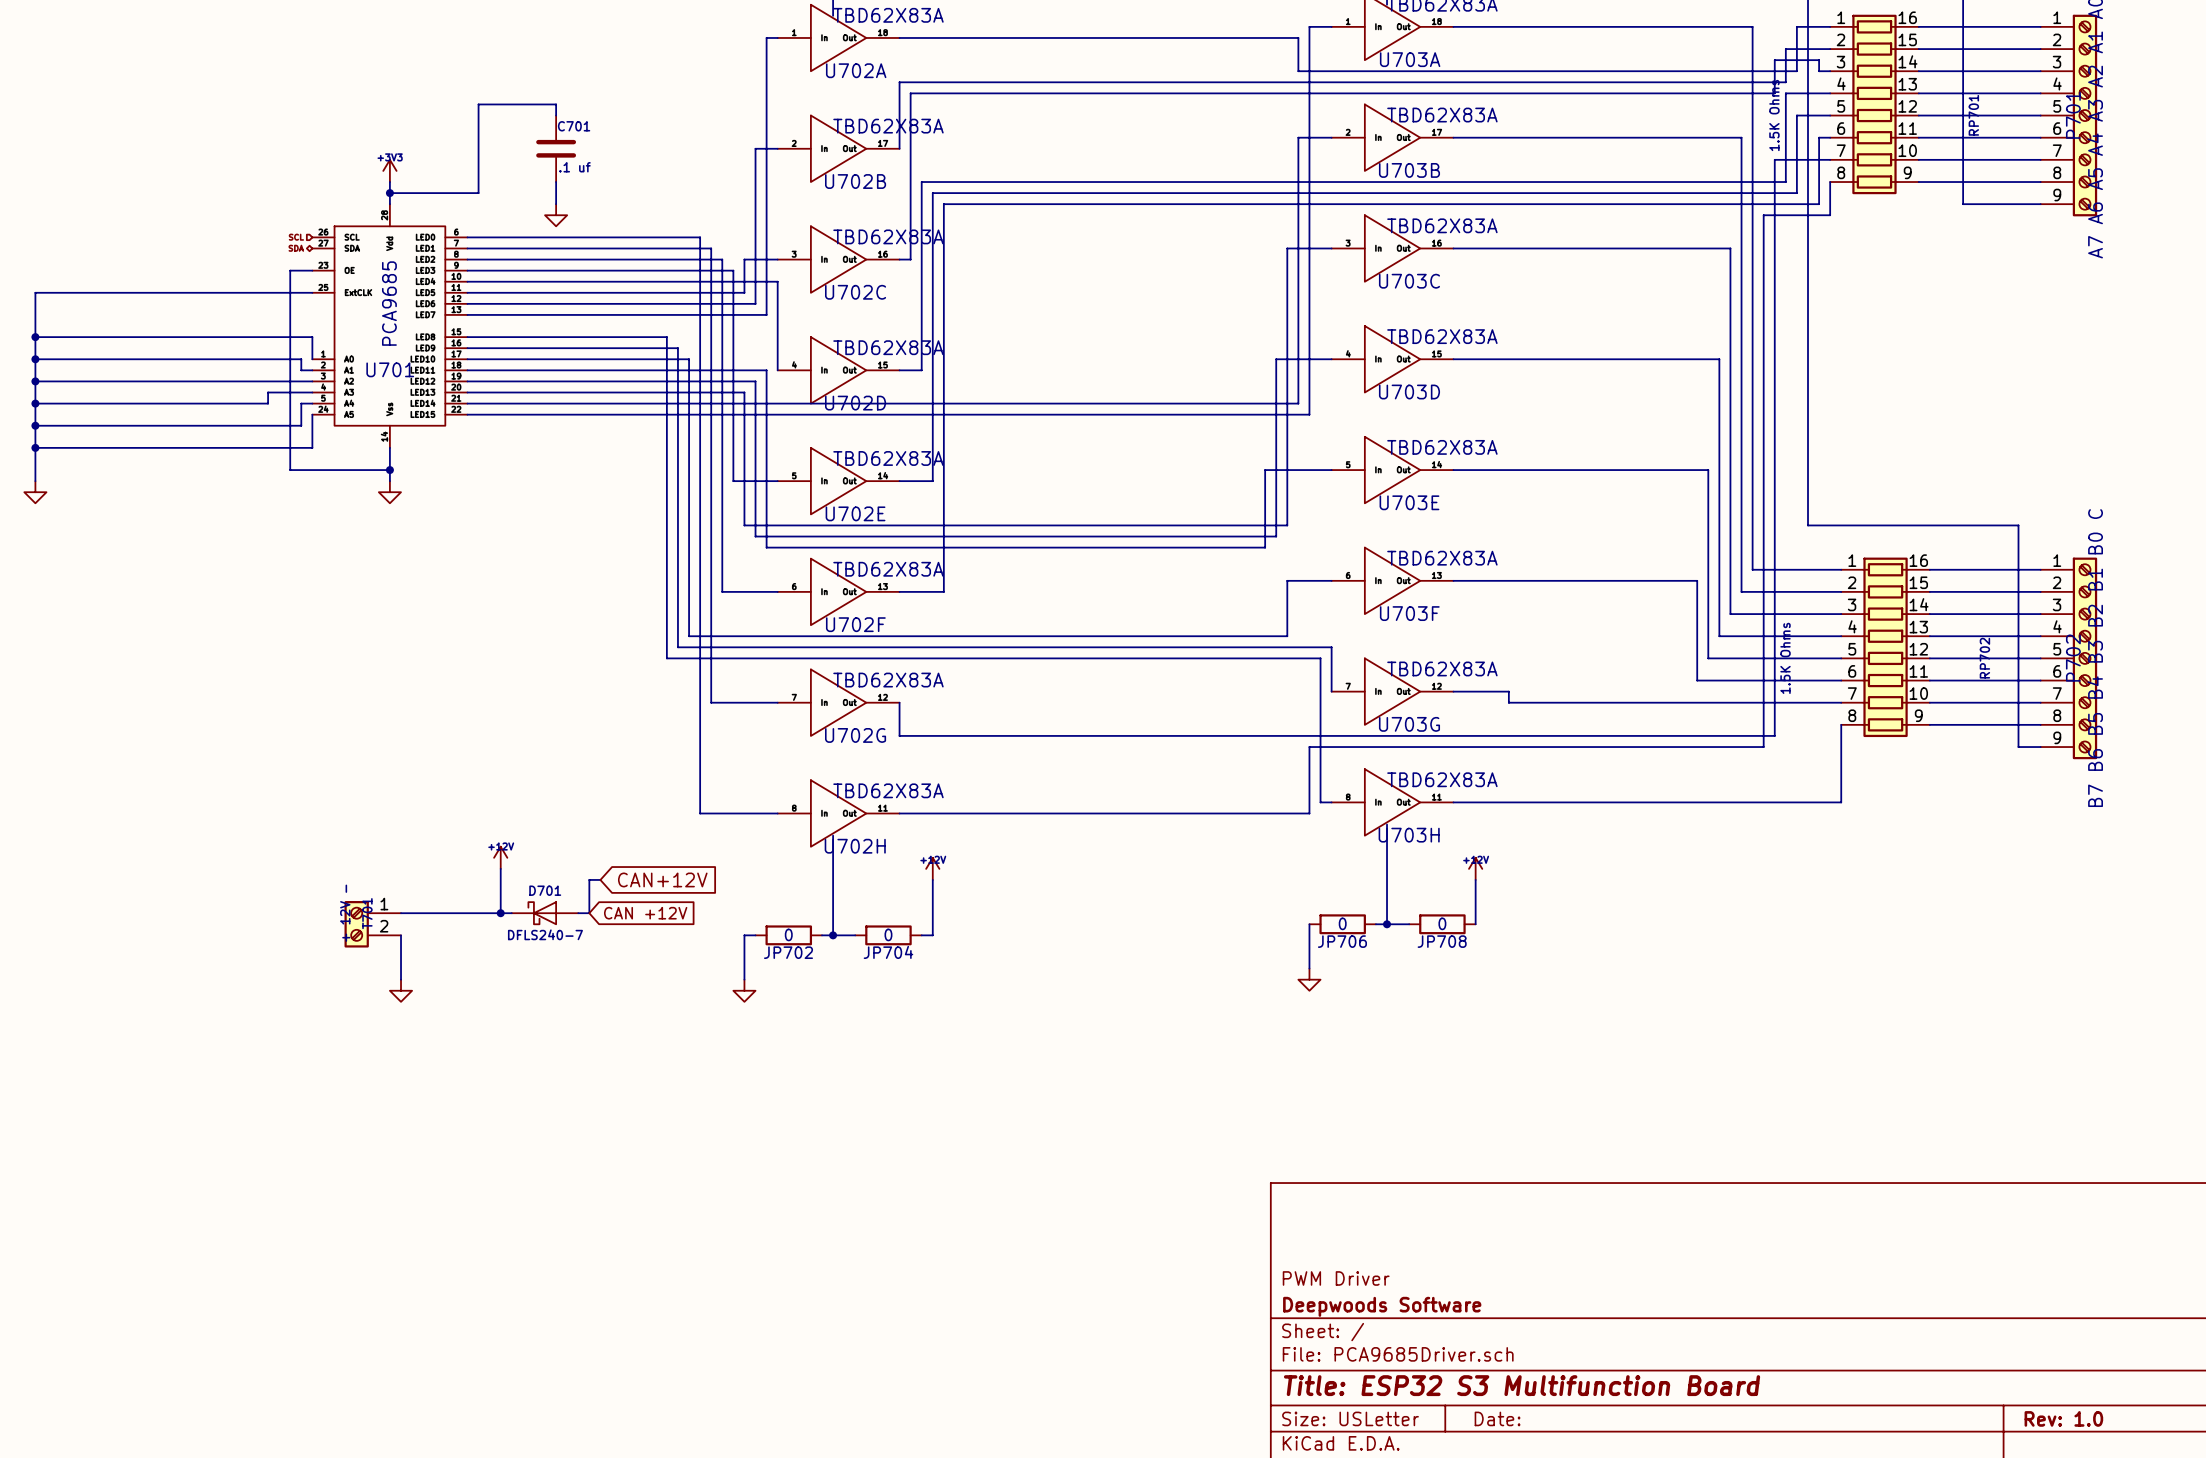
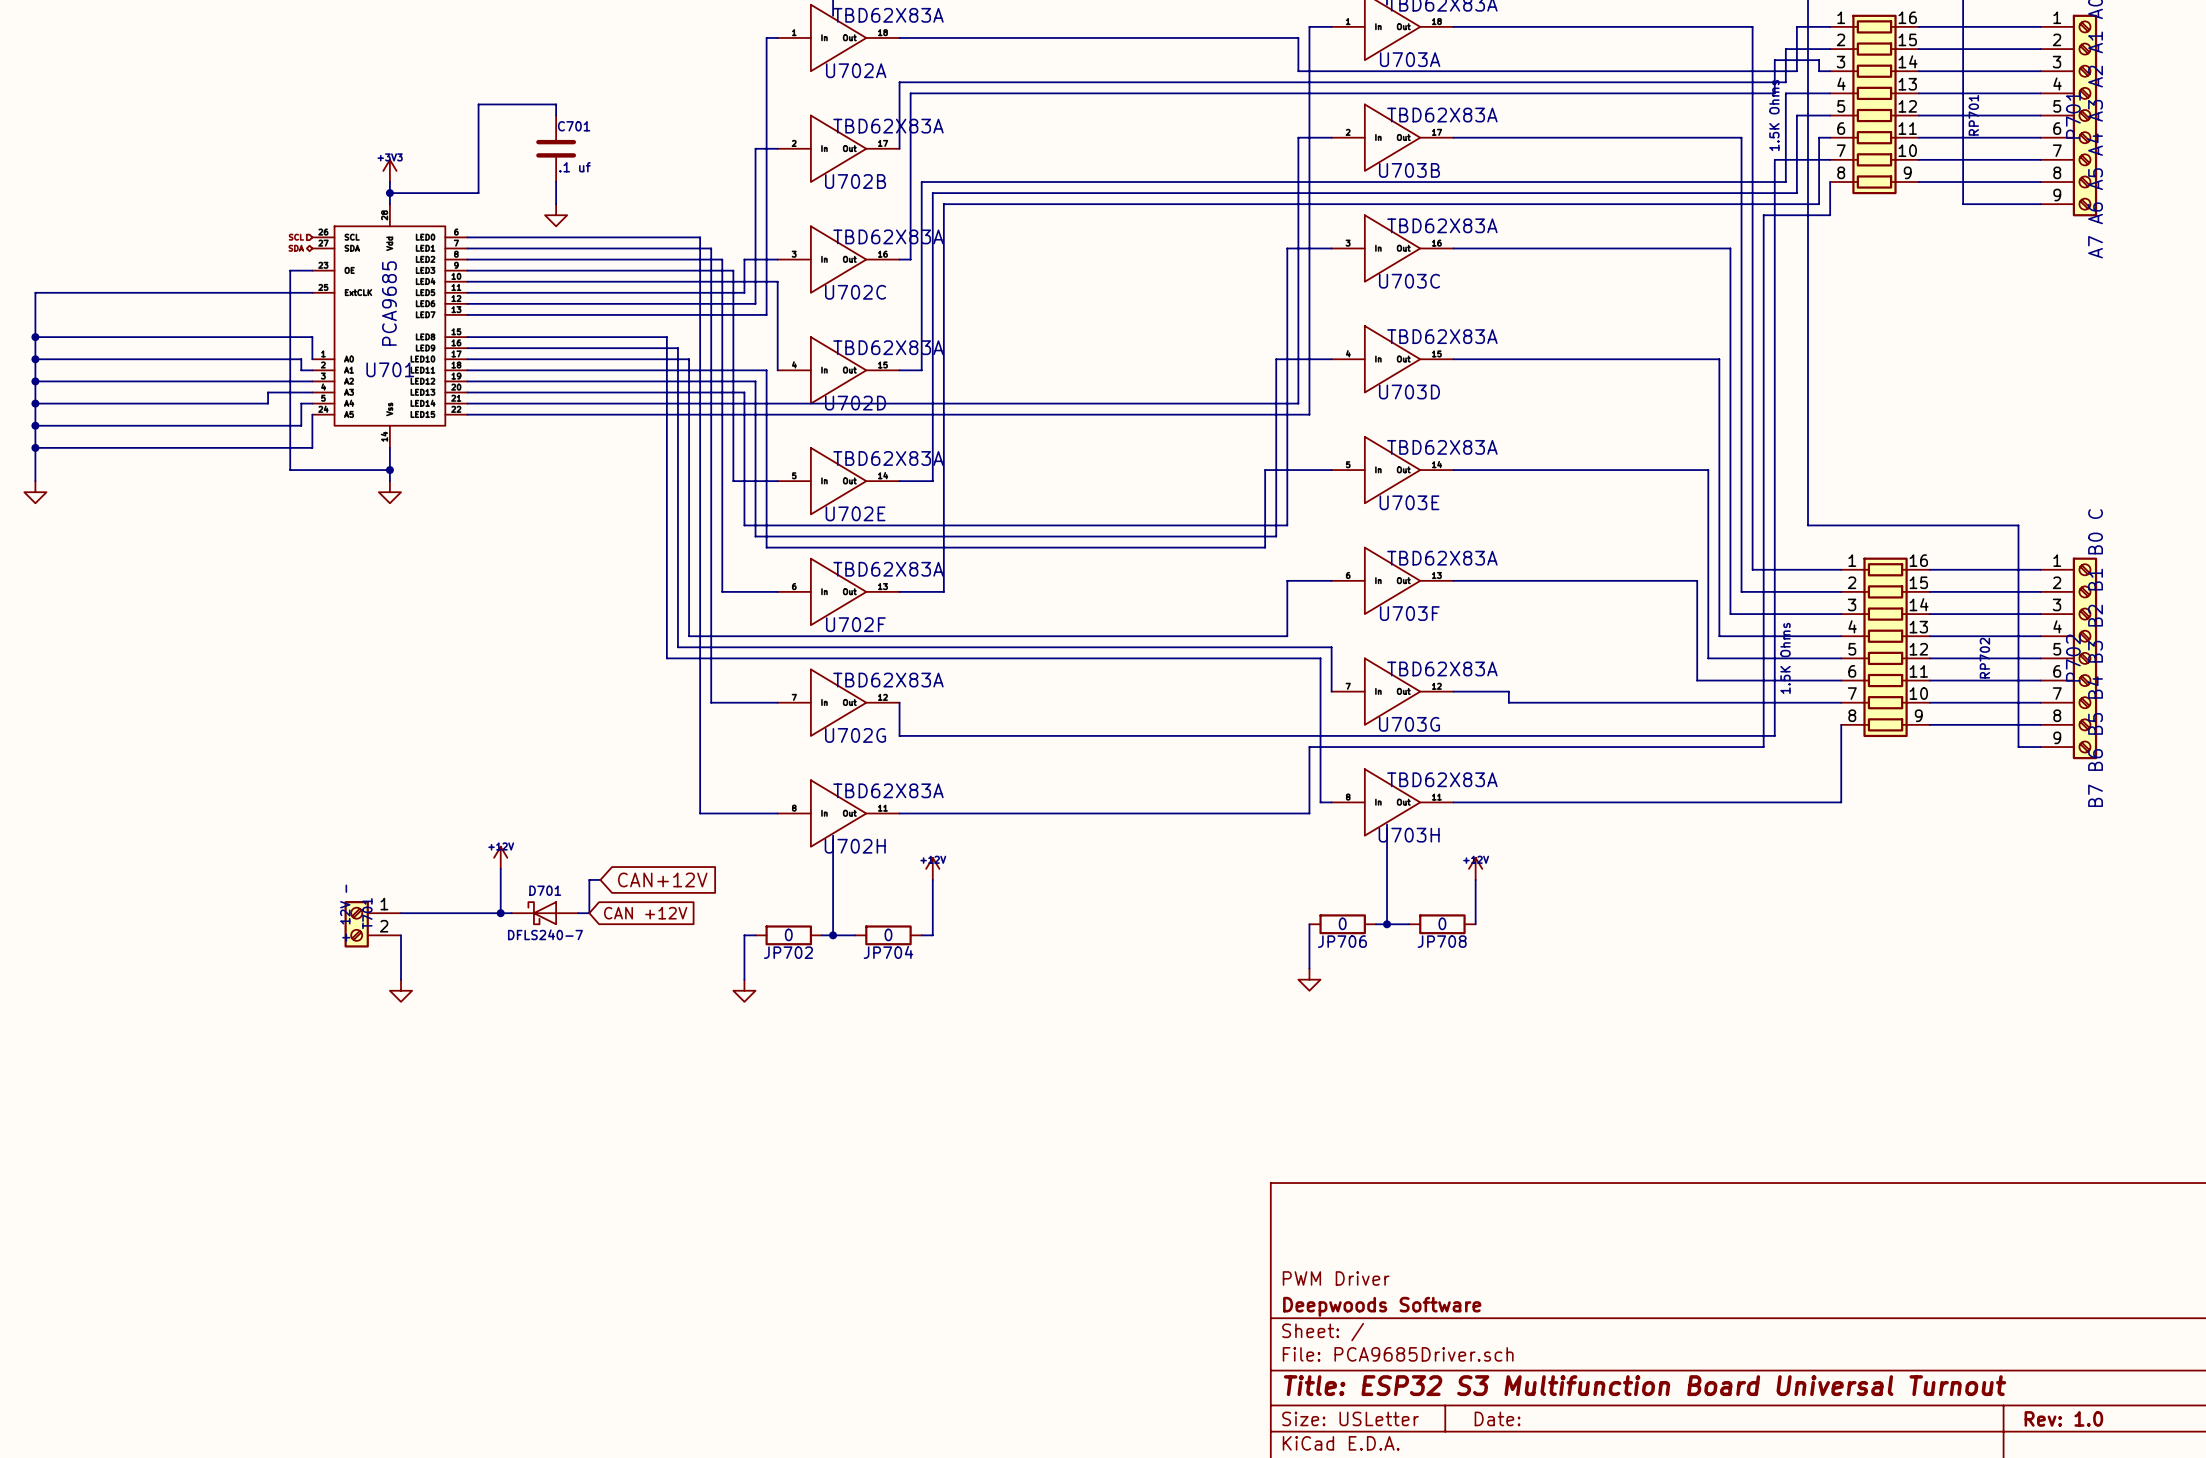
title block: Title: ESP32 S3 Multifunction Board (1522, 1385) -> Title: ESP32 S3 Multifunction Board Universal Turnout (1645, 1385)

